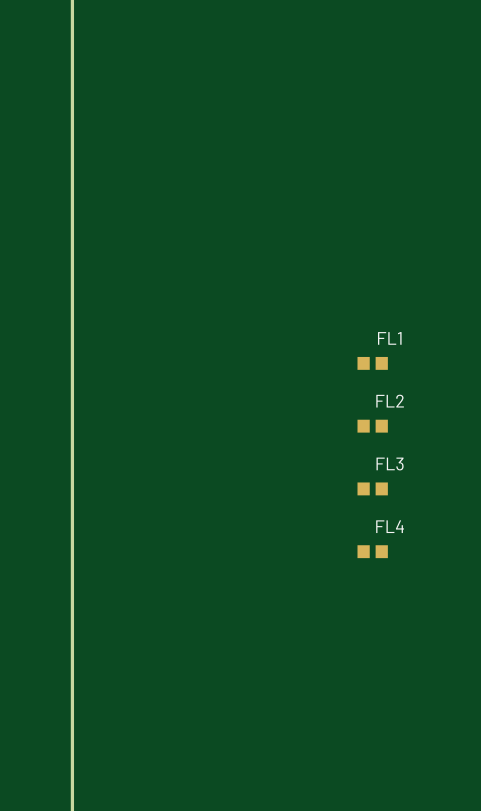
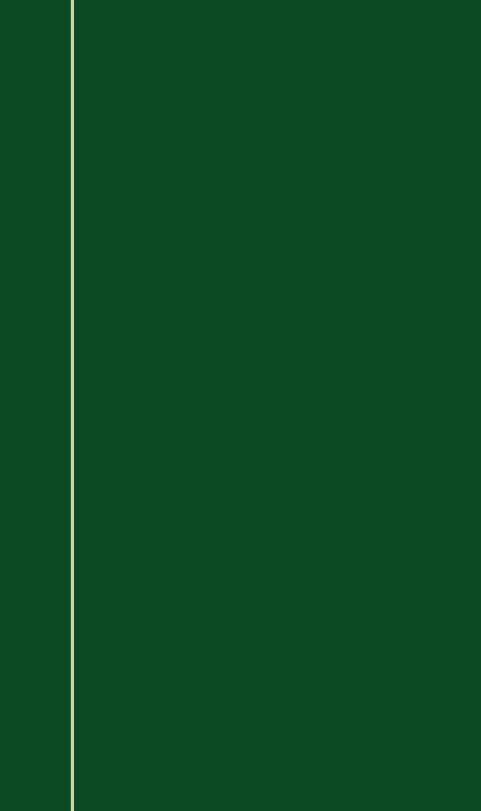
FL1: (372, 363) -> none
FL2: (372, 426) -> none
FL3: (372, 488) -> none
FL4: (372, 551) -> none

